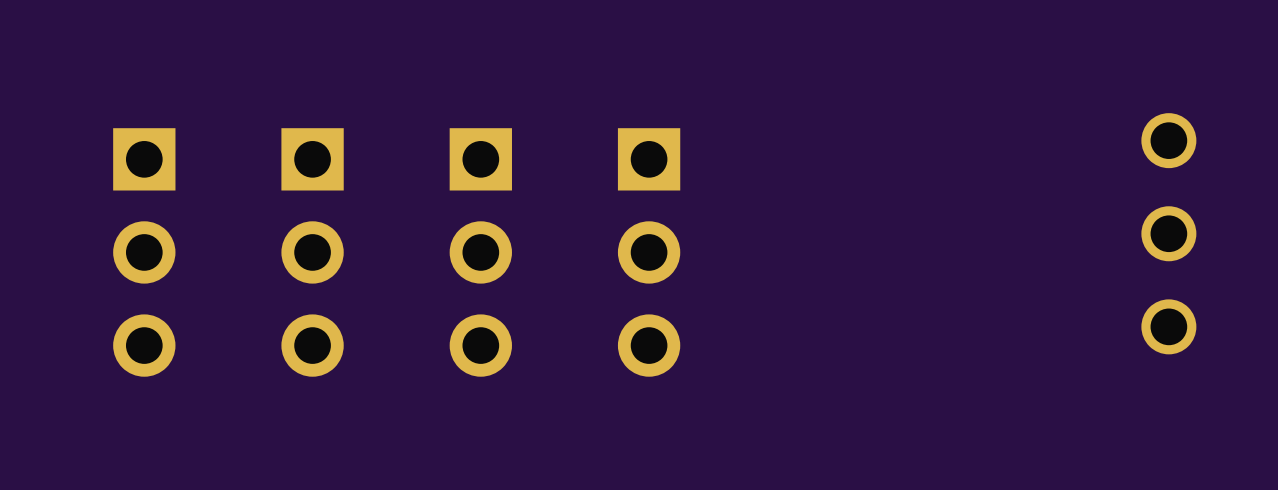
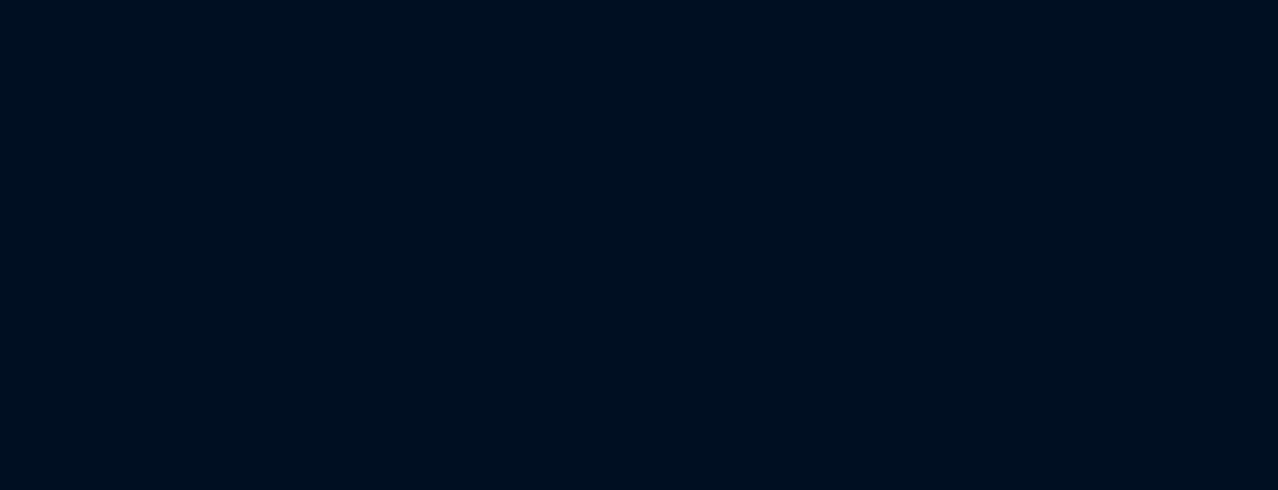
part: (1168, 233) -> none
part: (144, 252) -> none
part: (312, 252) -> none
part: (480, 252) -> none
part: (649, 252) -> none

